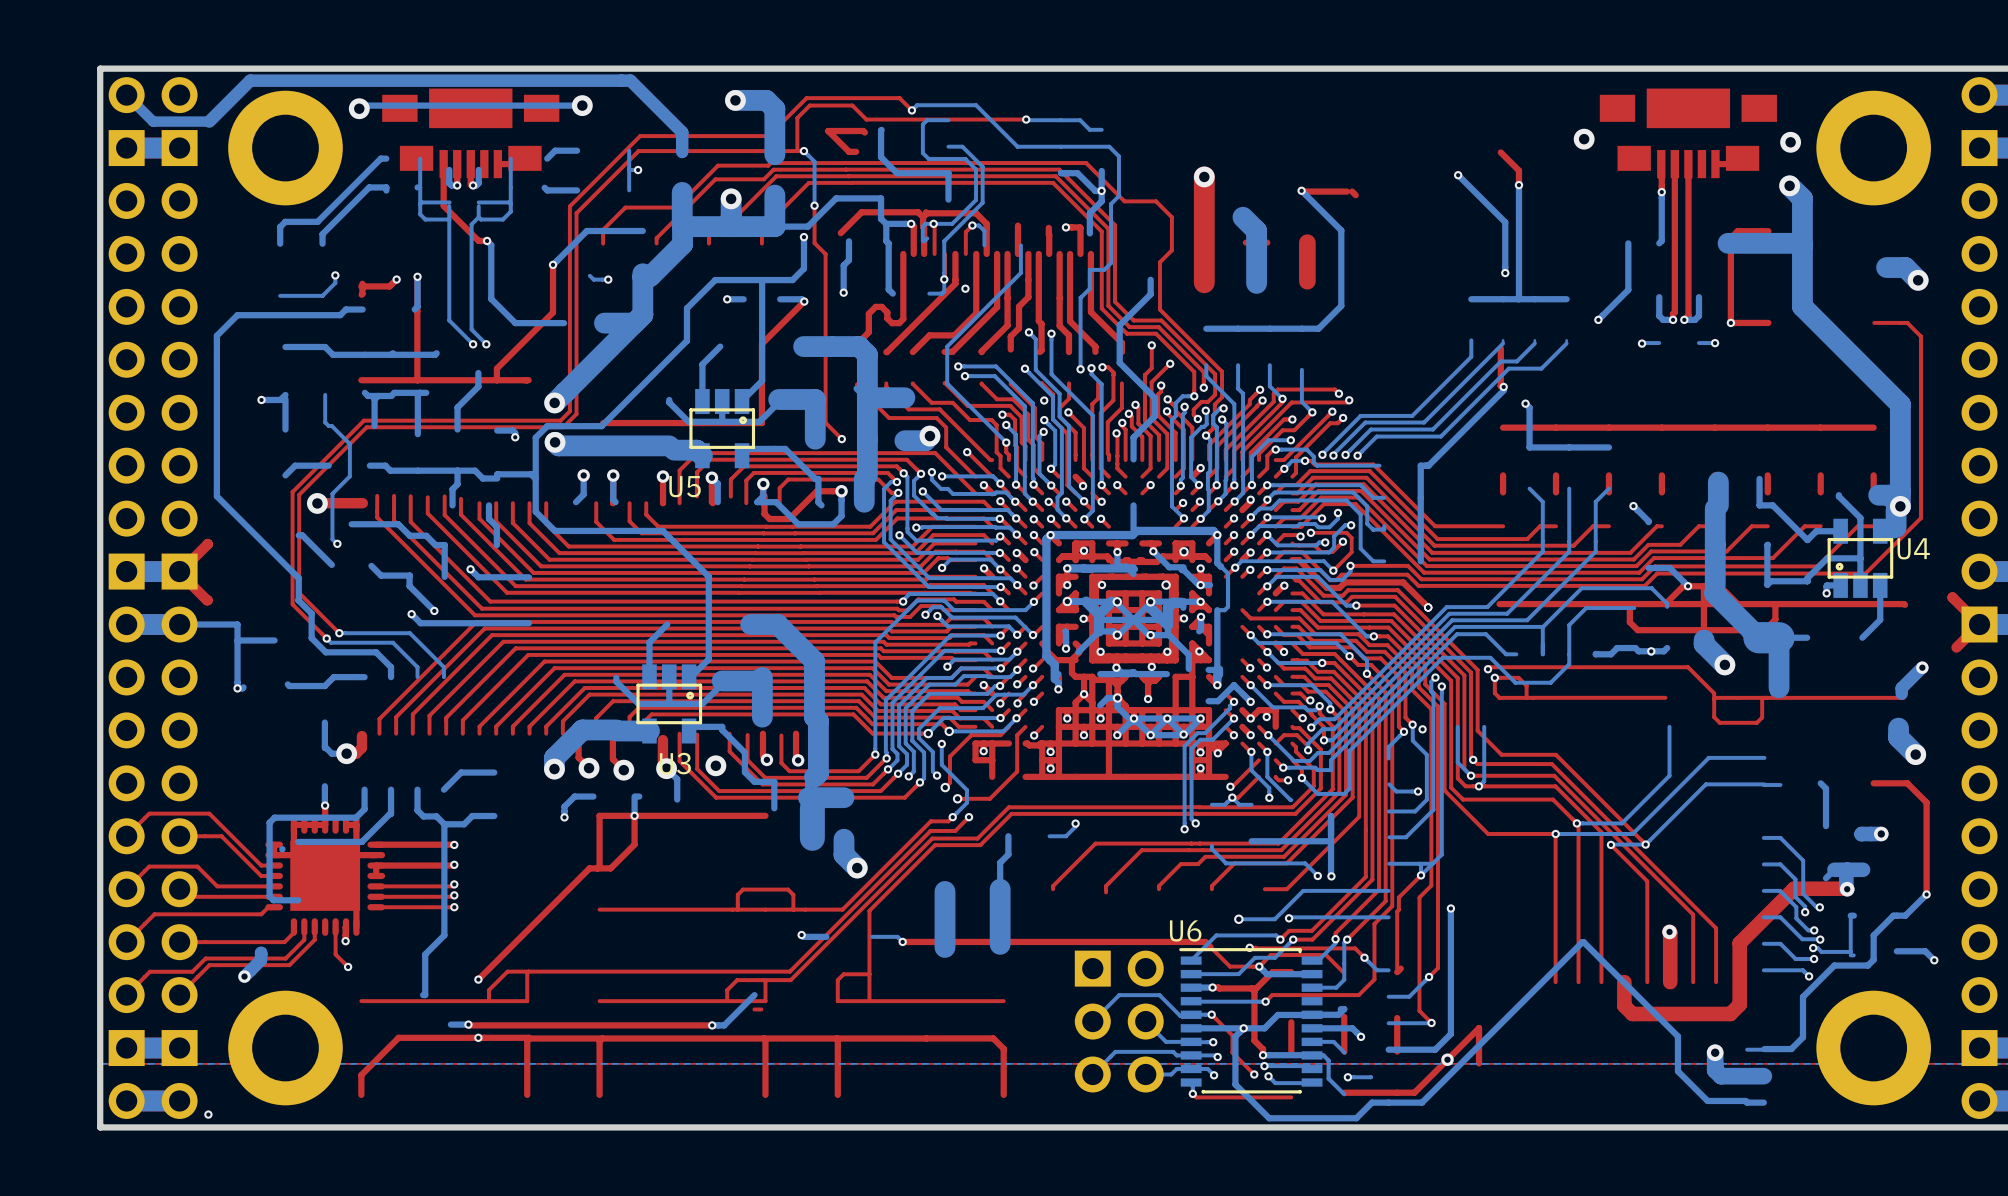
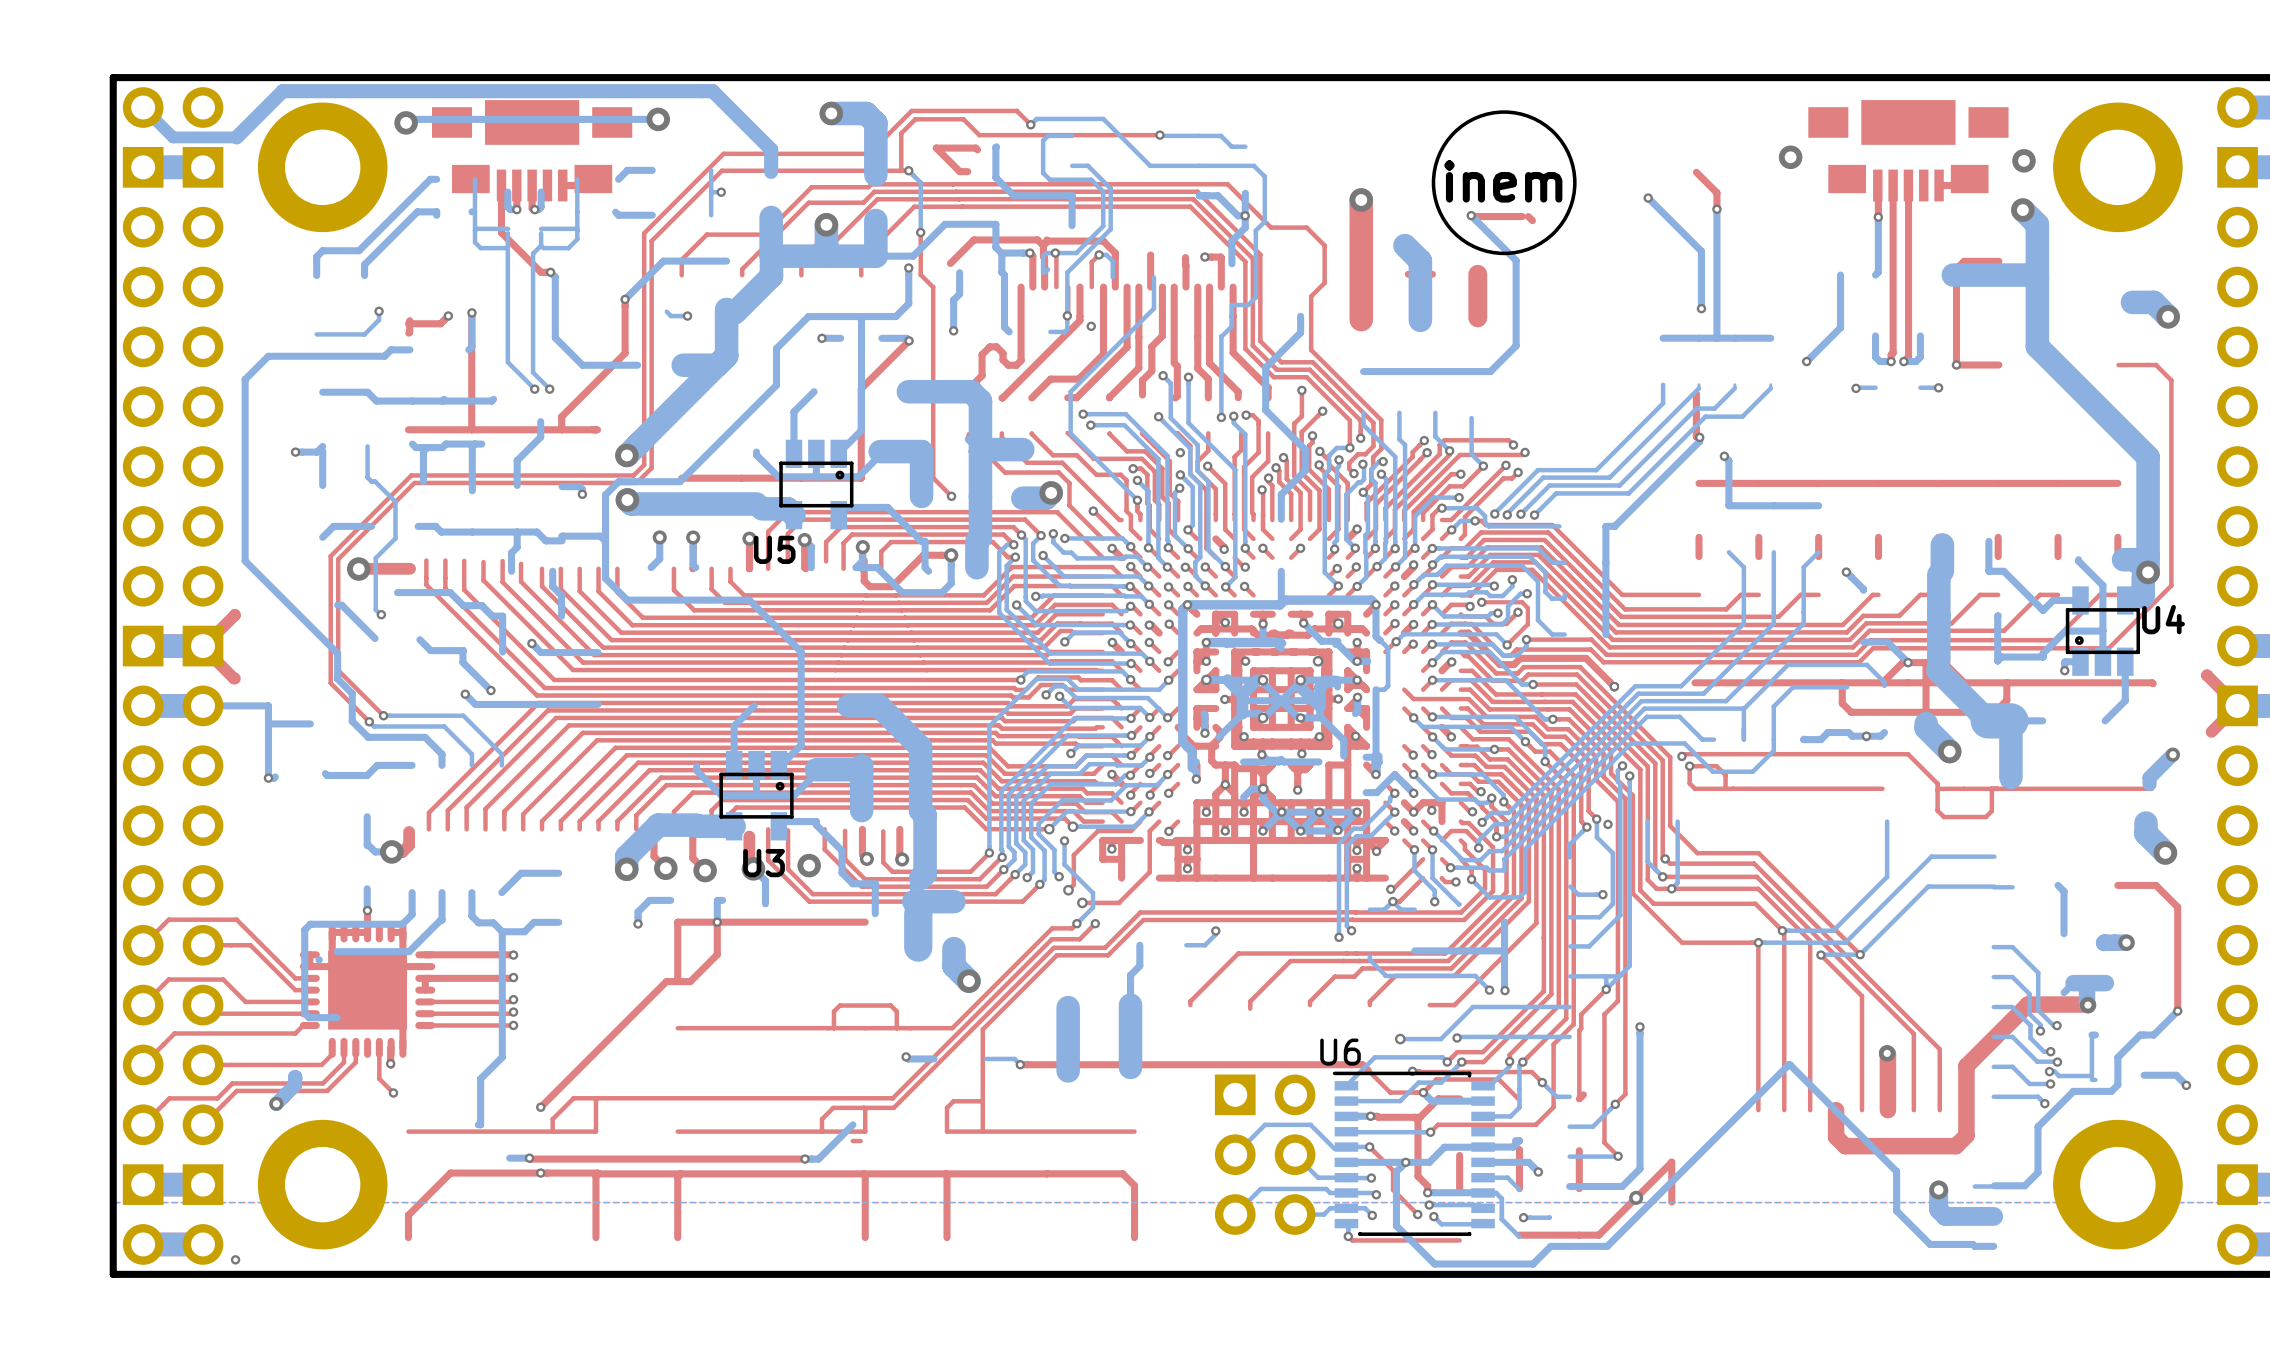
drawing: none -> [1431, 110, 1577, 256]

